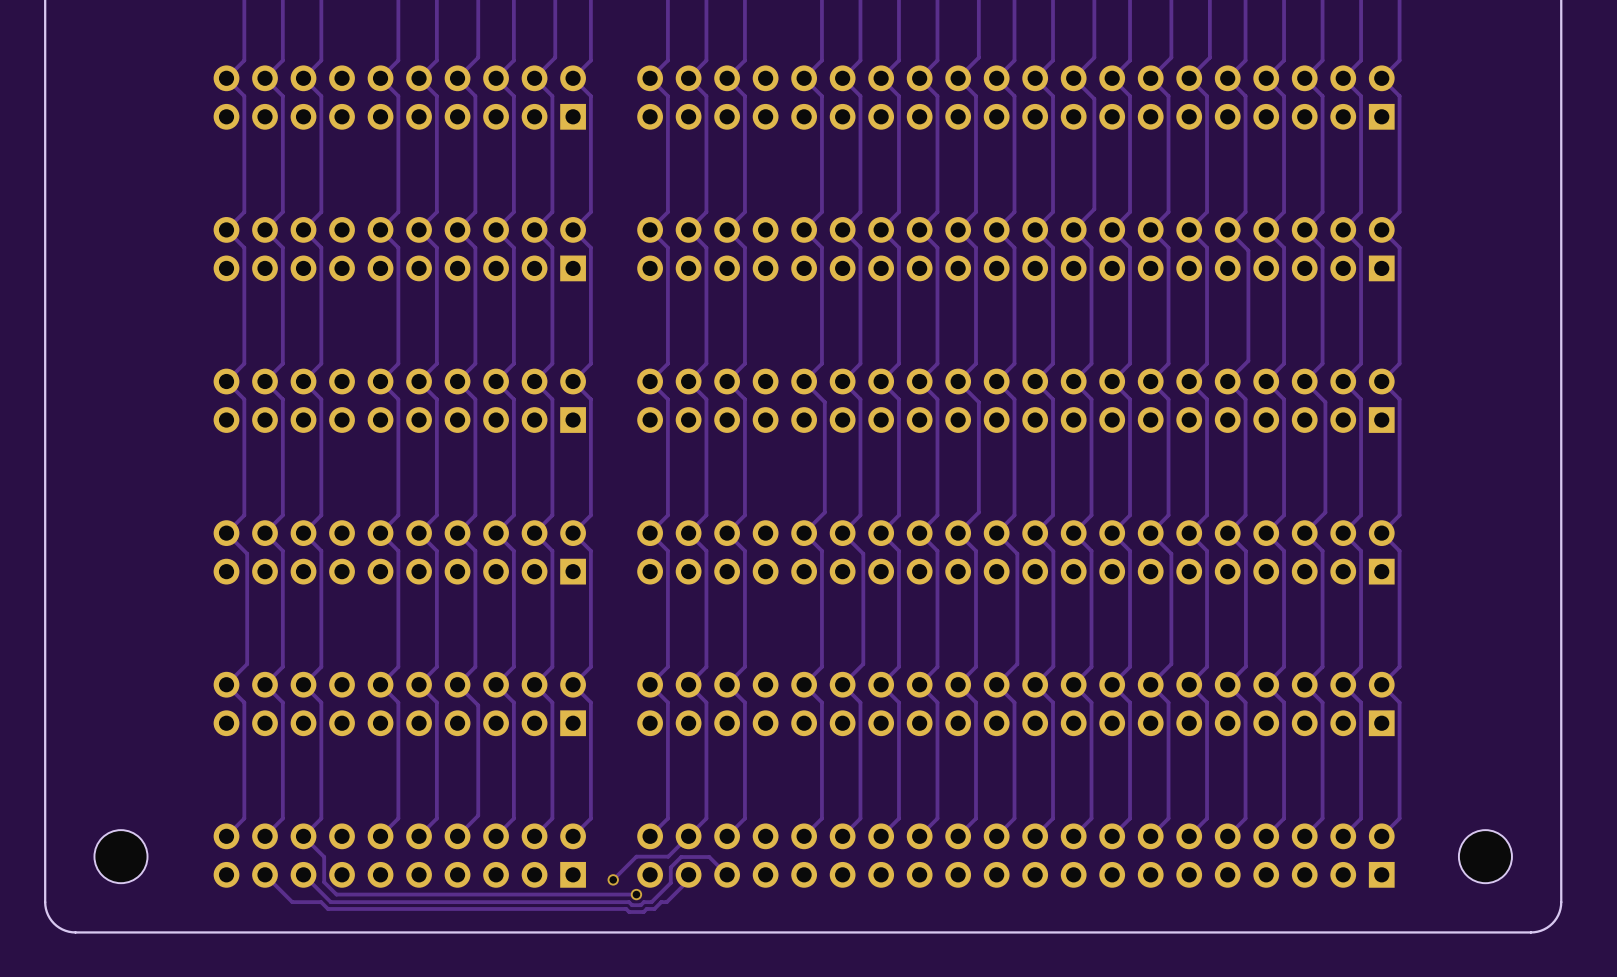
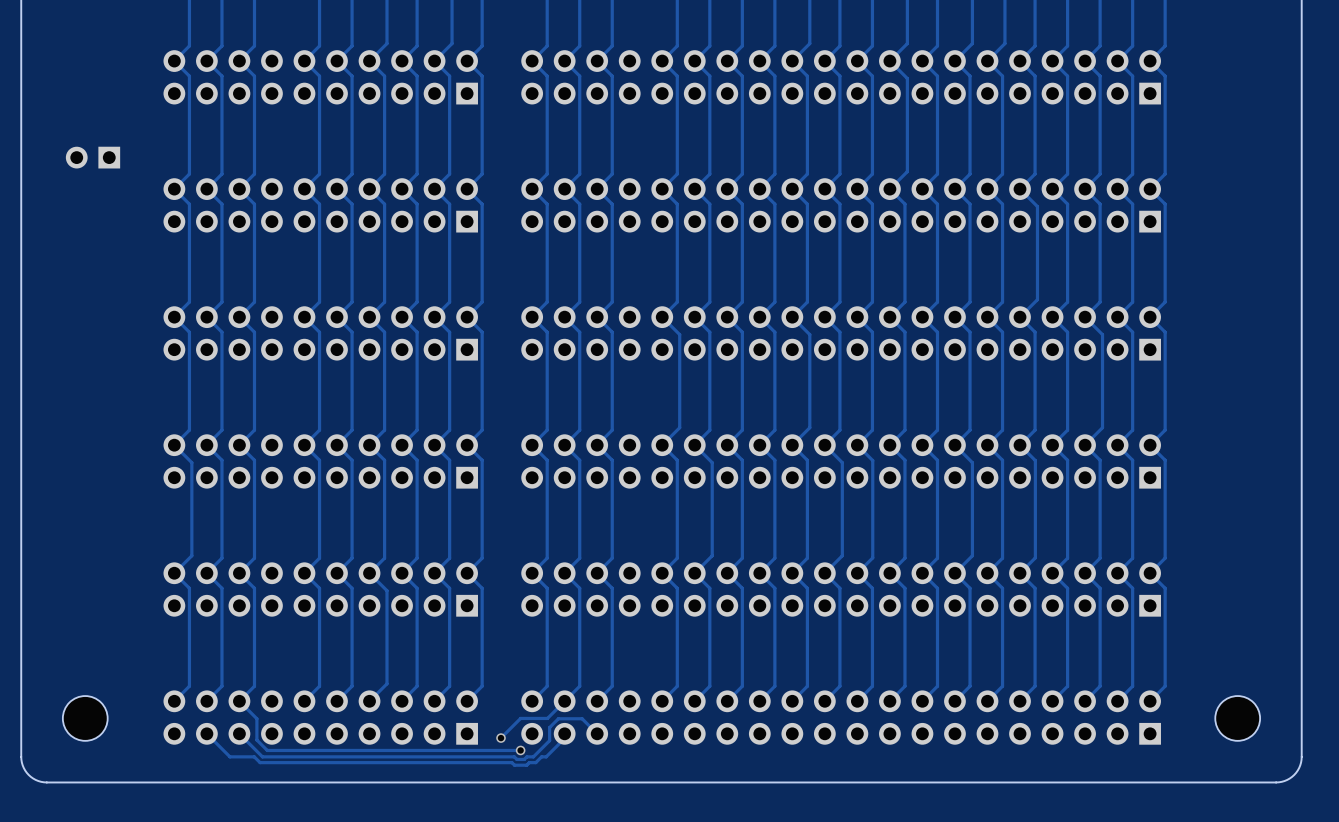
part: none -> (93, 157)

